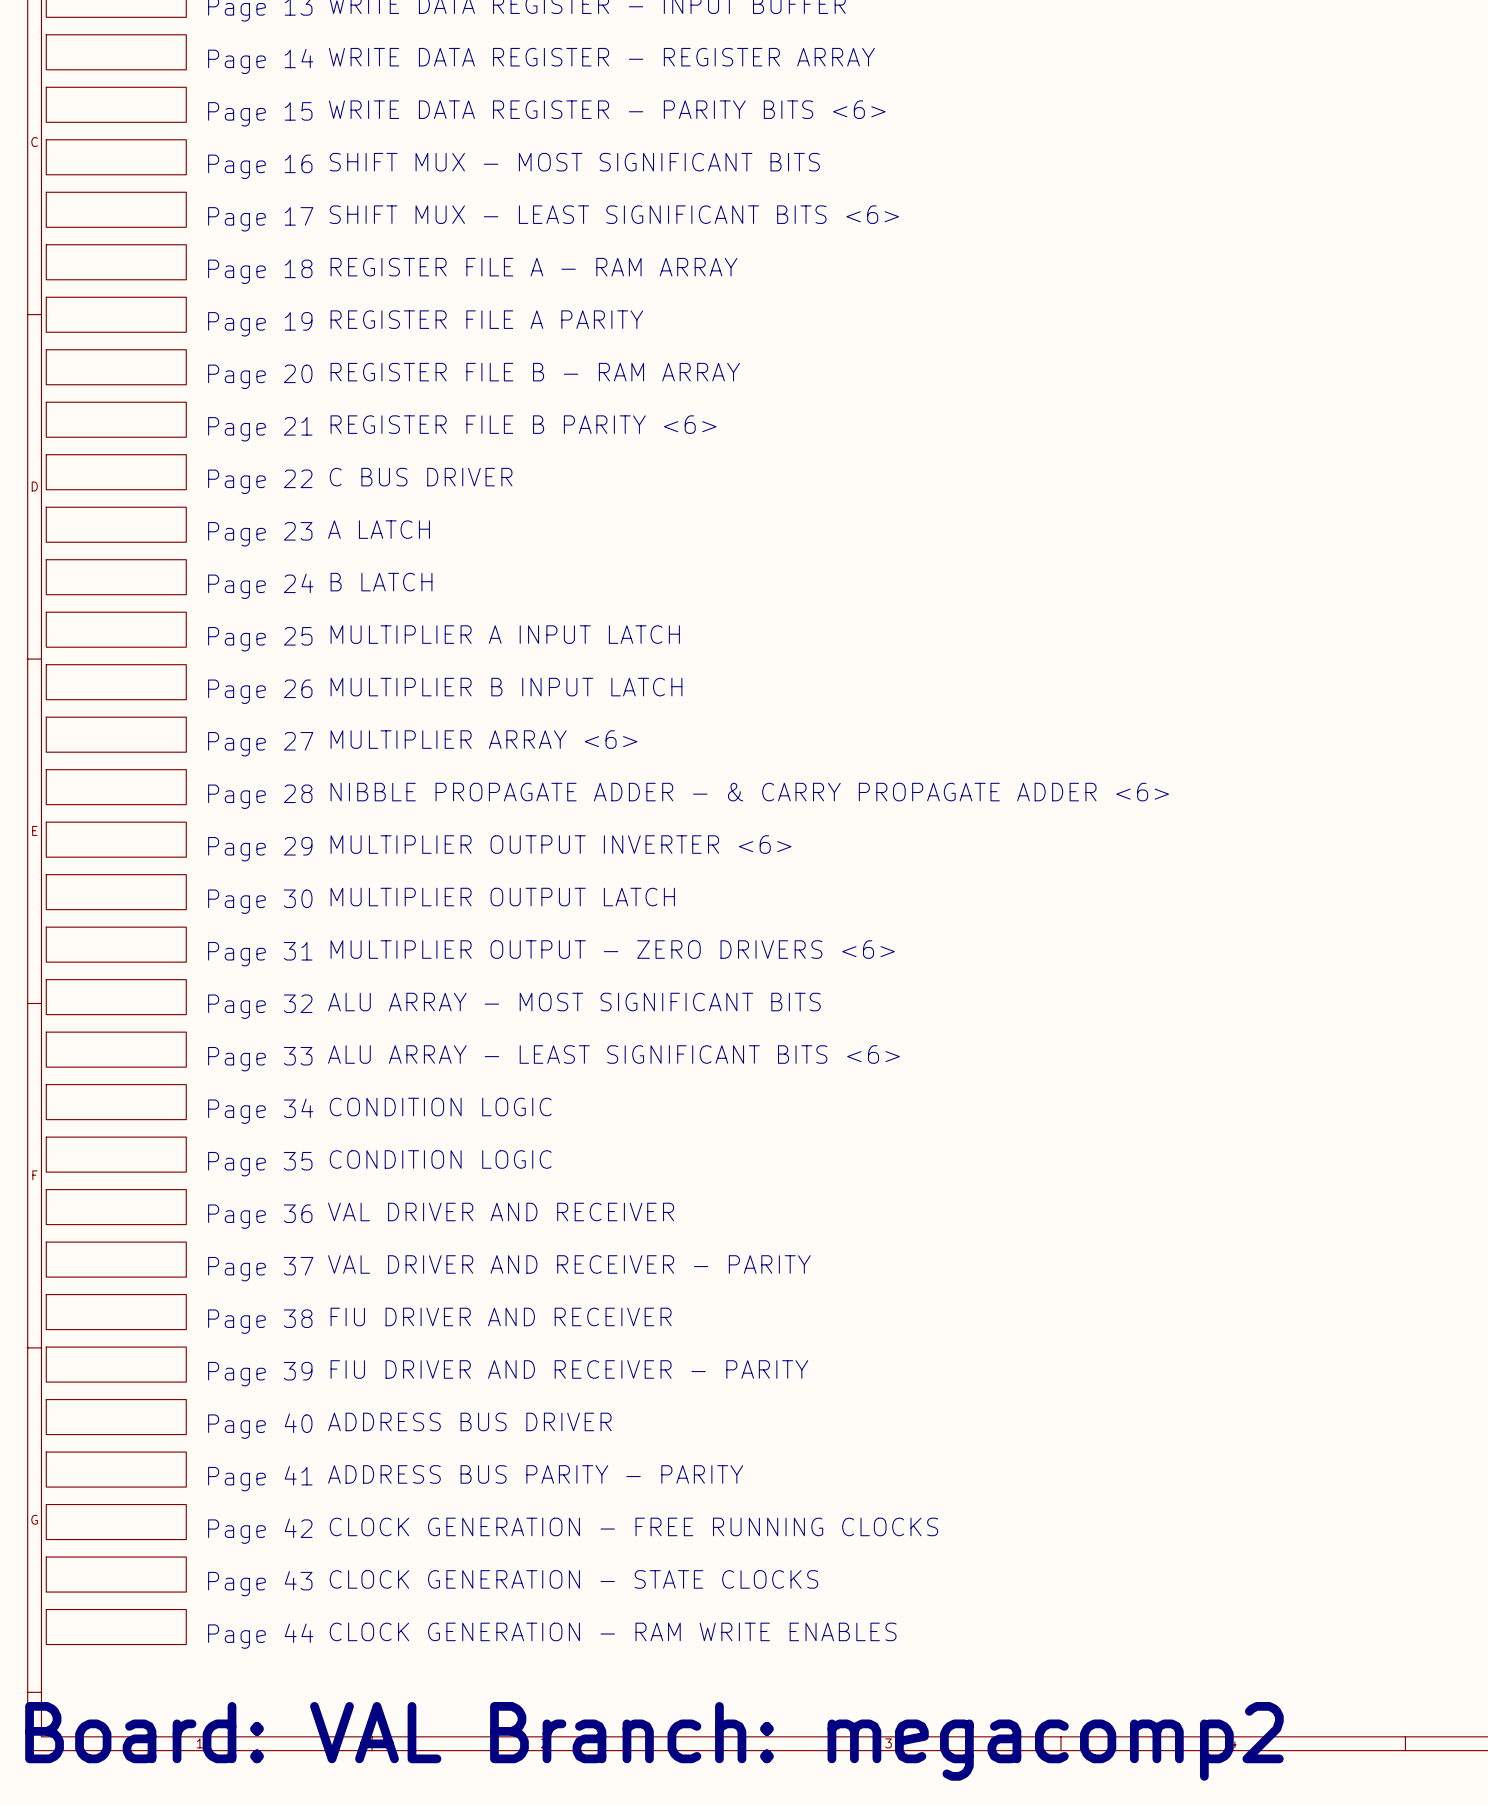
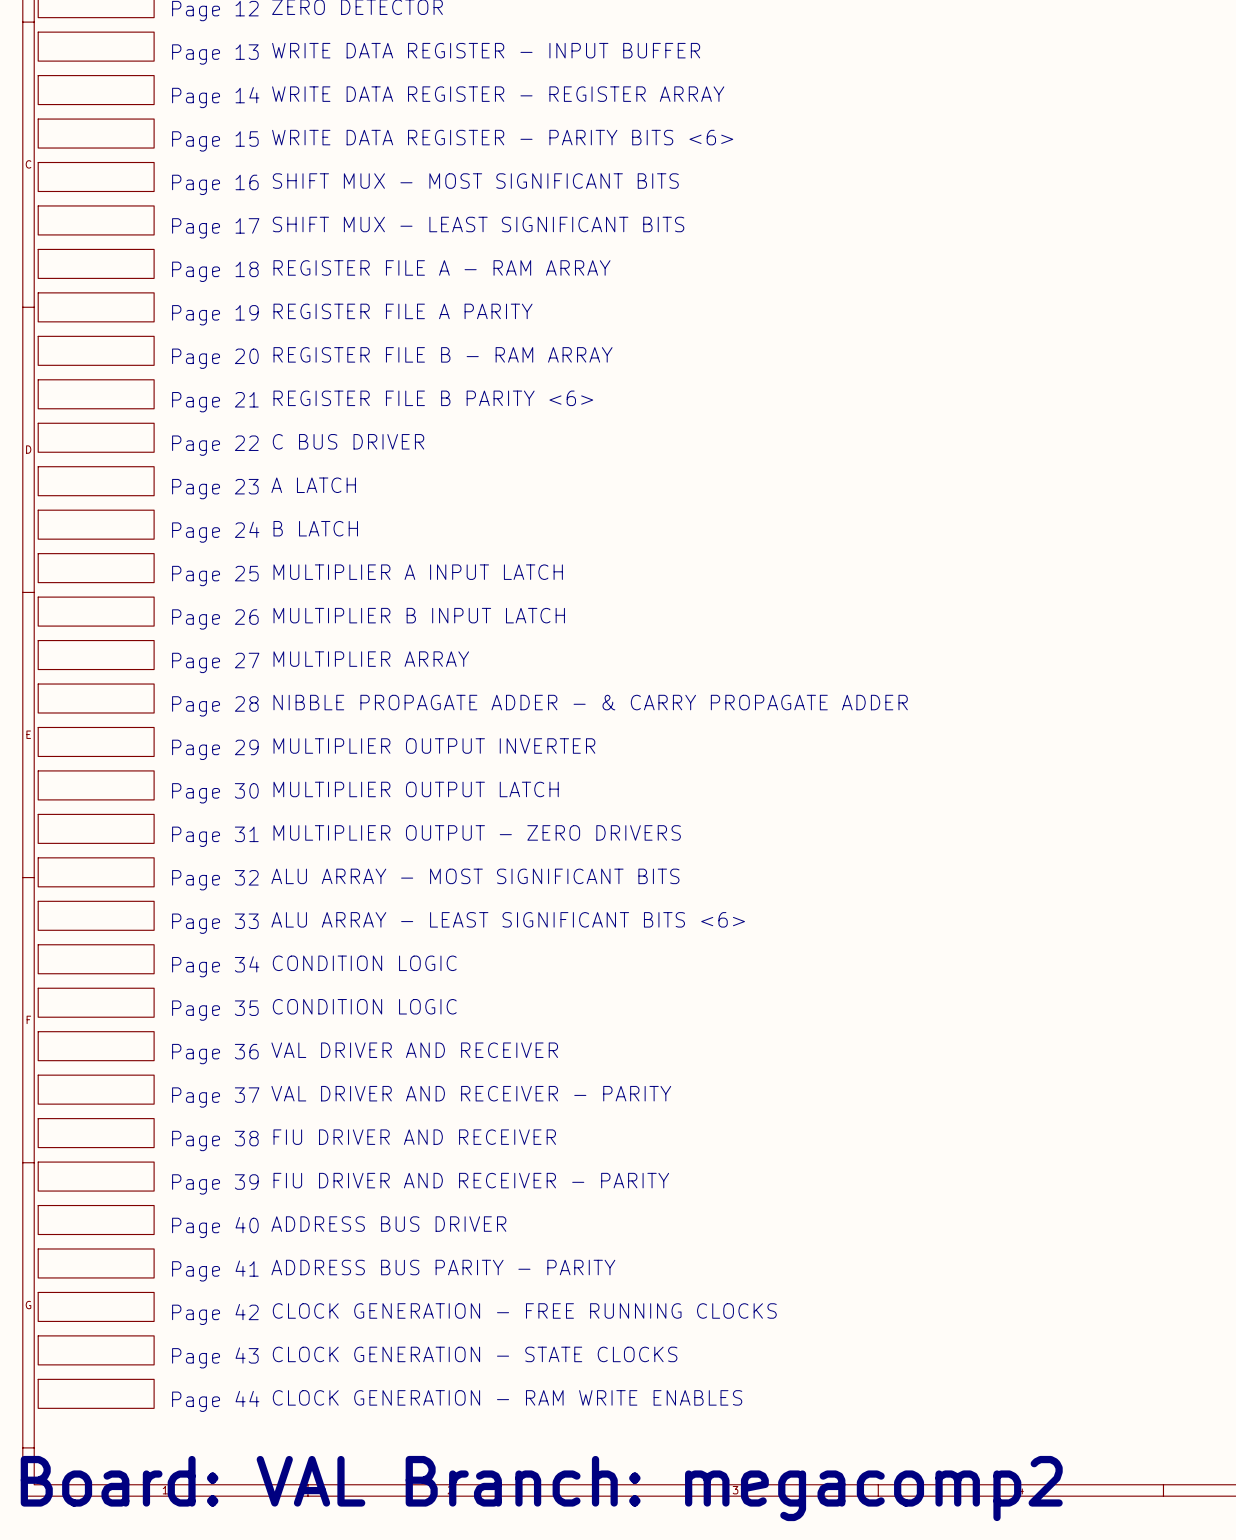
text: SHIFT MUX - LEAST SIGNIFICANT BITS <6> (614, 214) -> SHIFT MUX - LEAST SIGNIFICANT BITS (478, 224)
text: MULTIPLIER ARRAY <6> (483, 739) -> MULTIPLIER ARRAY (371, 659)
text: NIBBLE PROPAGATE ADDER - & CARRY PROPAGATE ADDER <6> (749, 792) -> NIBBLE PROPAGATE ADDER - & CARRY PROPAGATE ADDER (590, 702)
text: MULTIPLIER OUTPUT INVERTER <6> (561, 844) -> MULTIPLIER OUTPUT INVERTER (434, 746)
text: MULTIPLIER OUTPUT - ZERO DRIVERS <6> (612, 949) -> MULTIPLIER OUTPUT - ZERO DRIVERS (477, 832)

